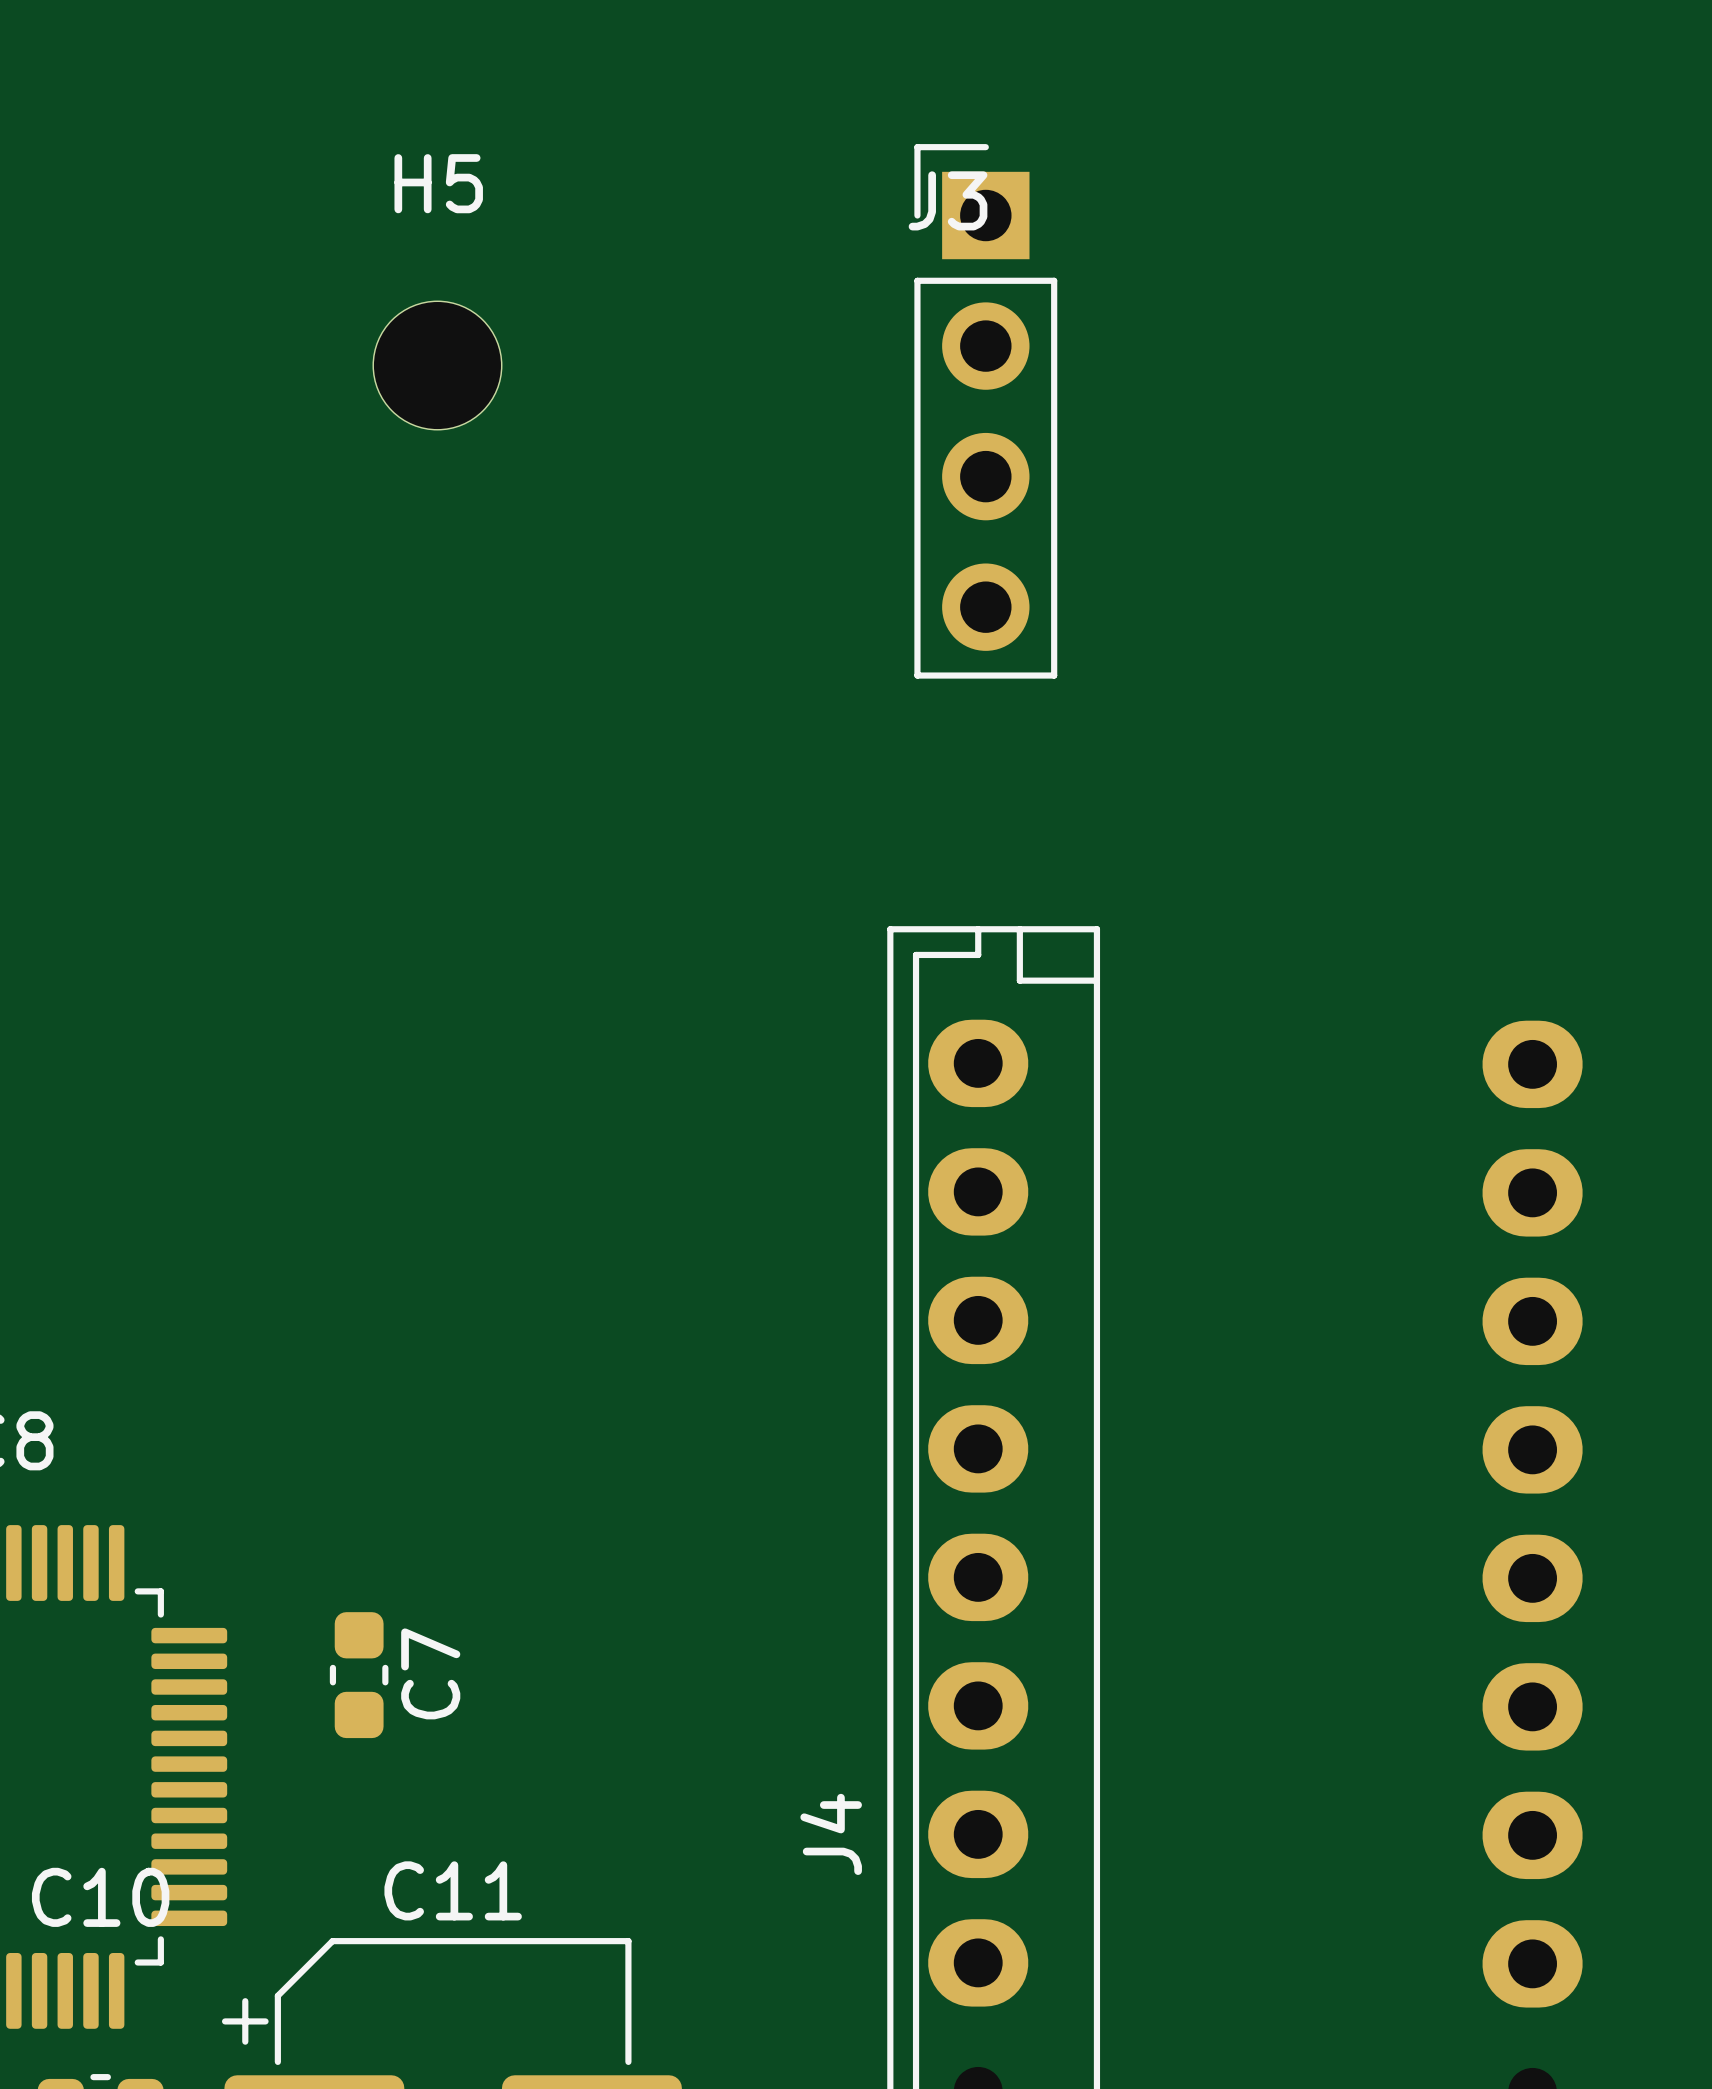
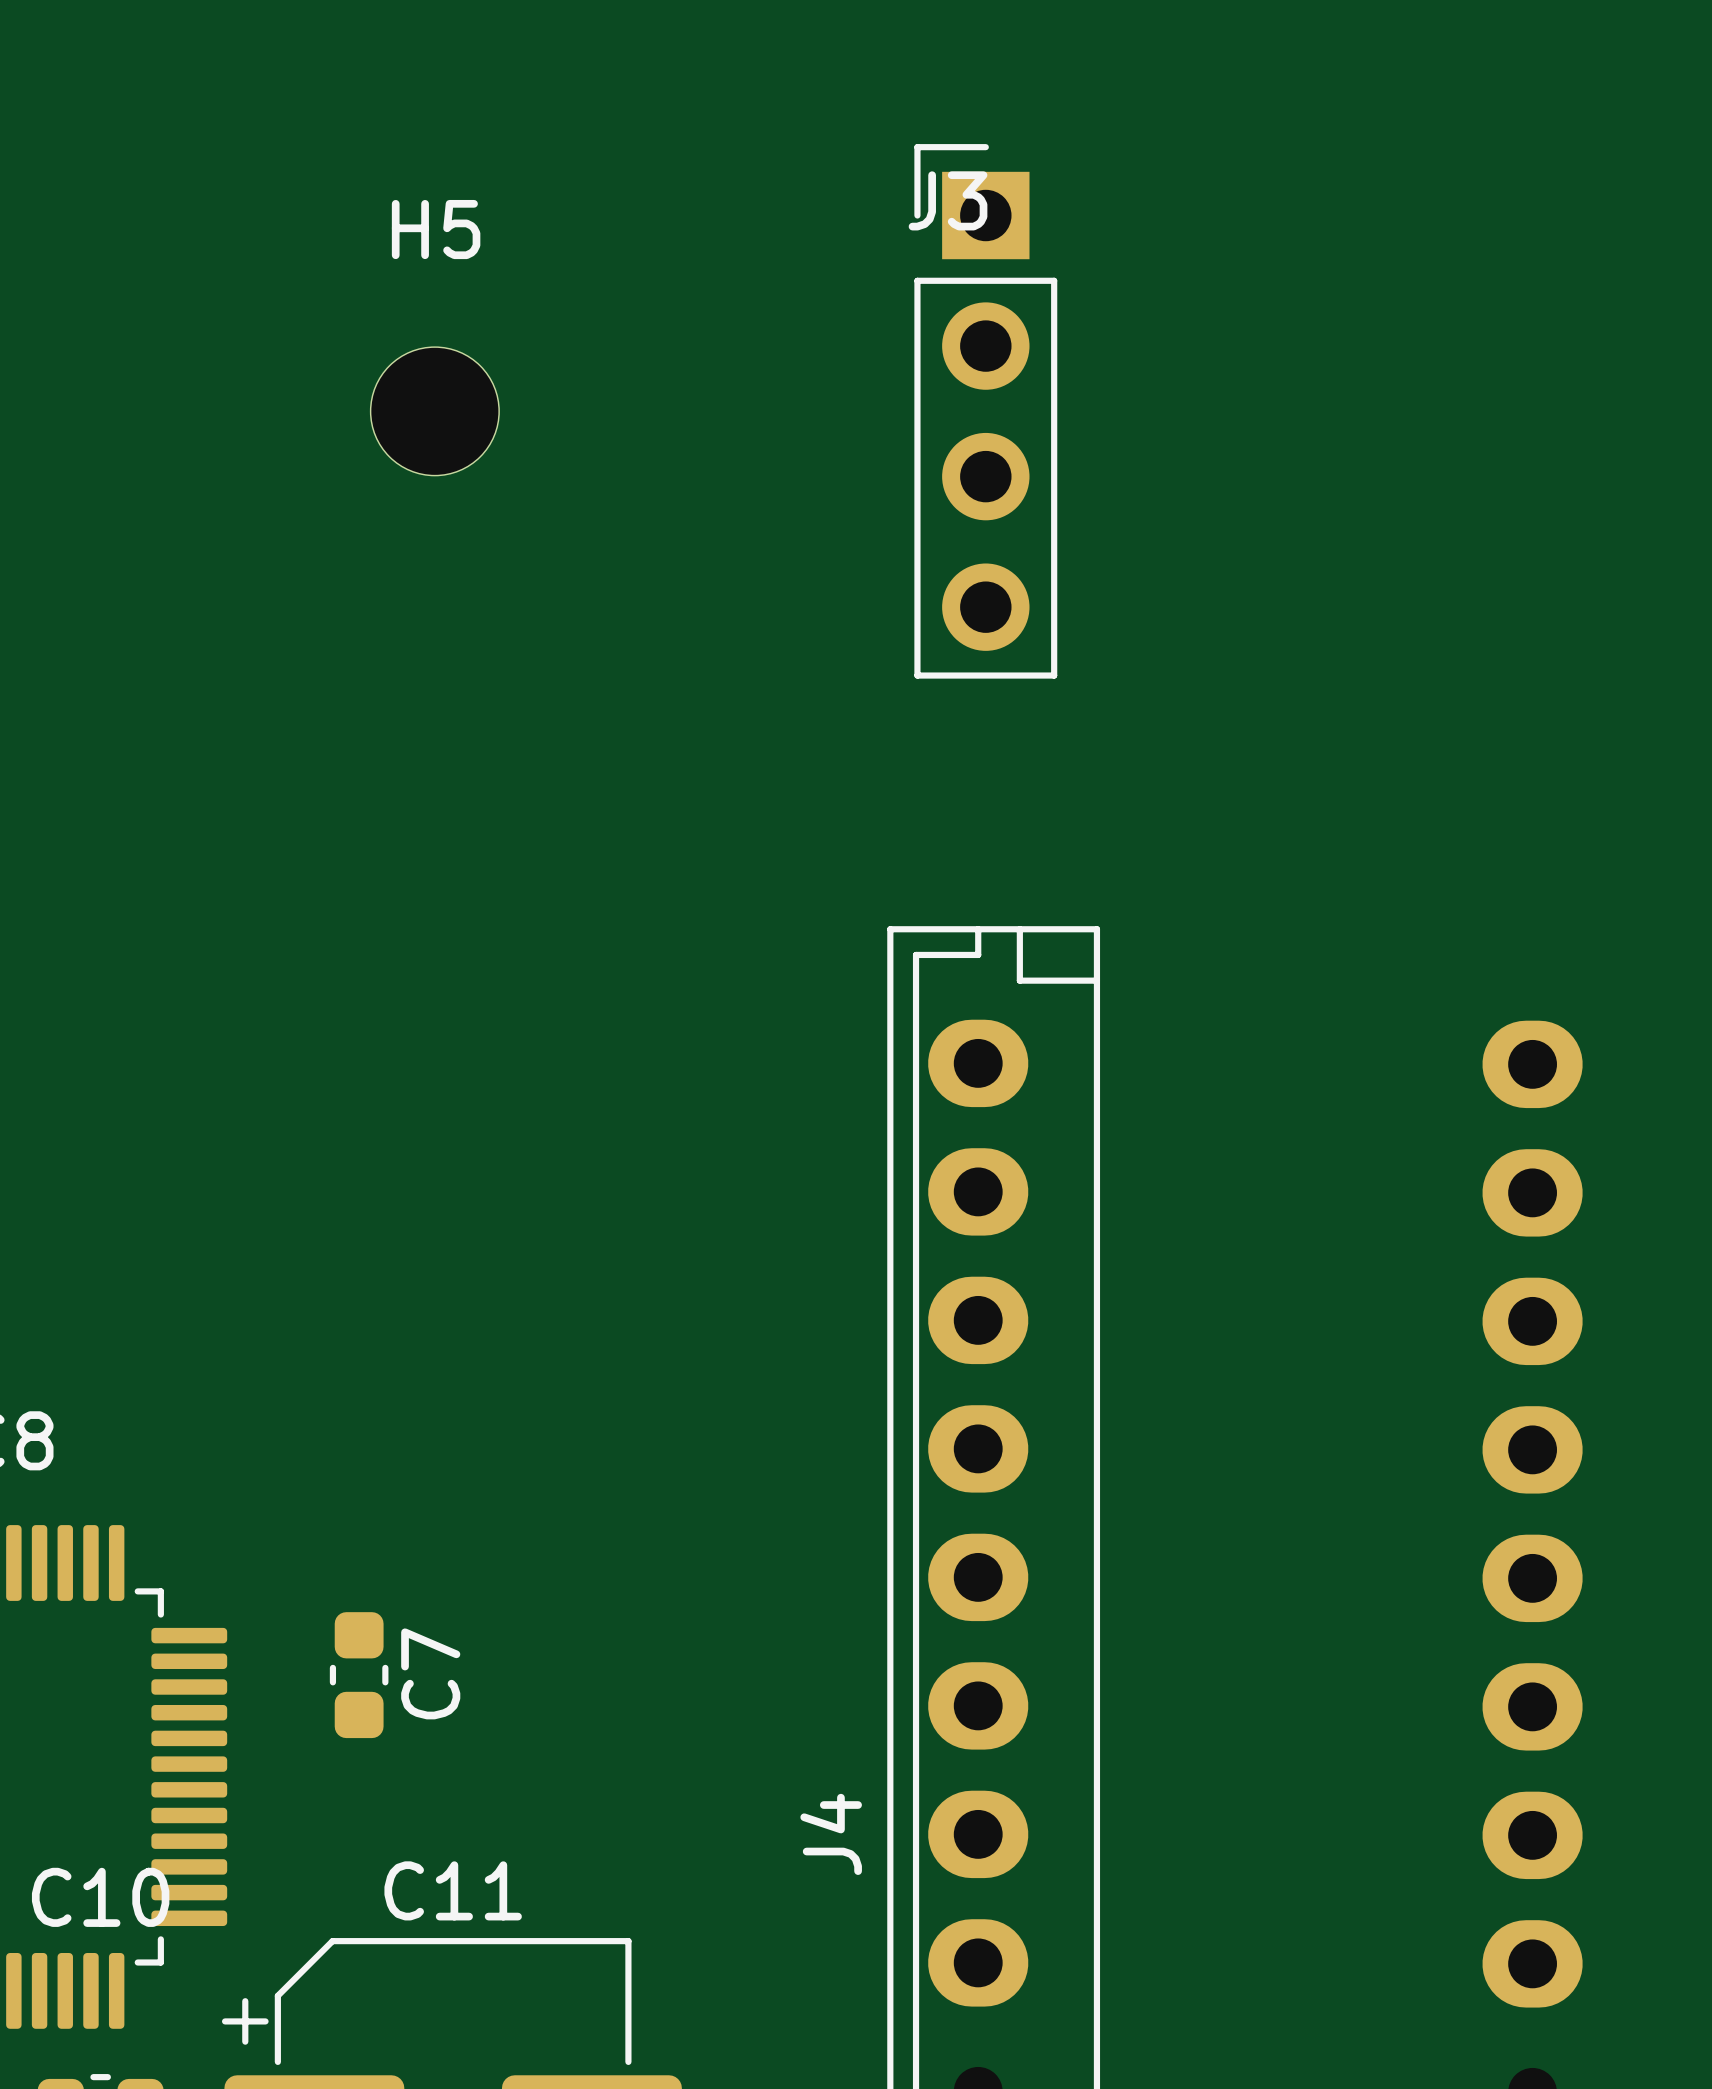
H5 position: (437, 365) -> (434, 411)

